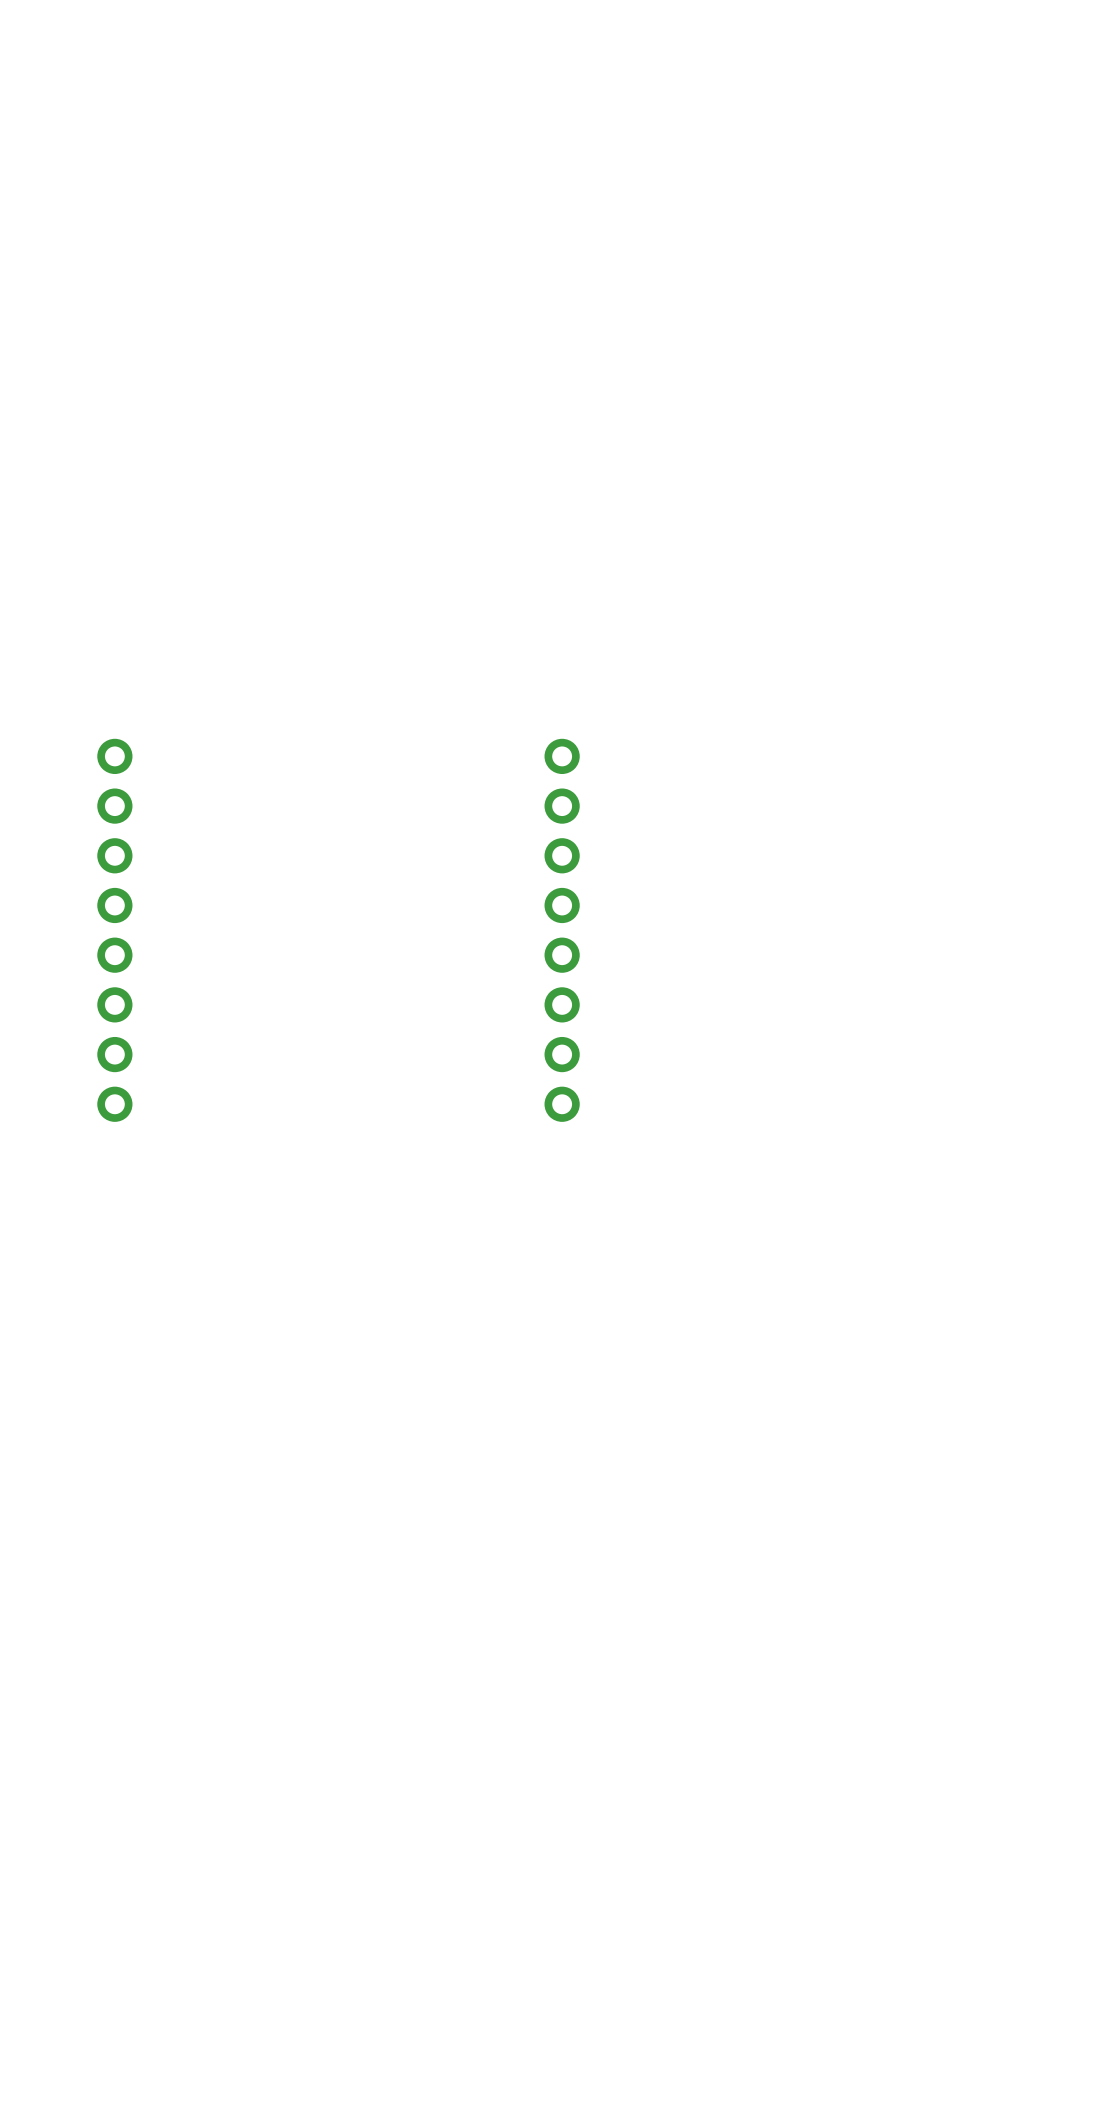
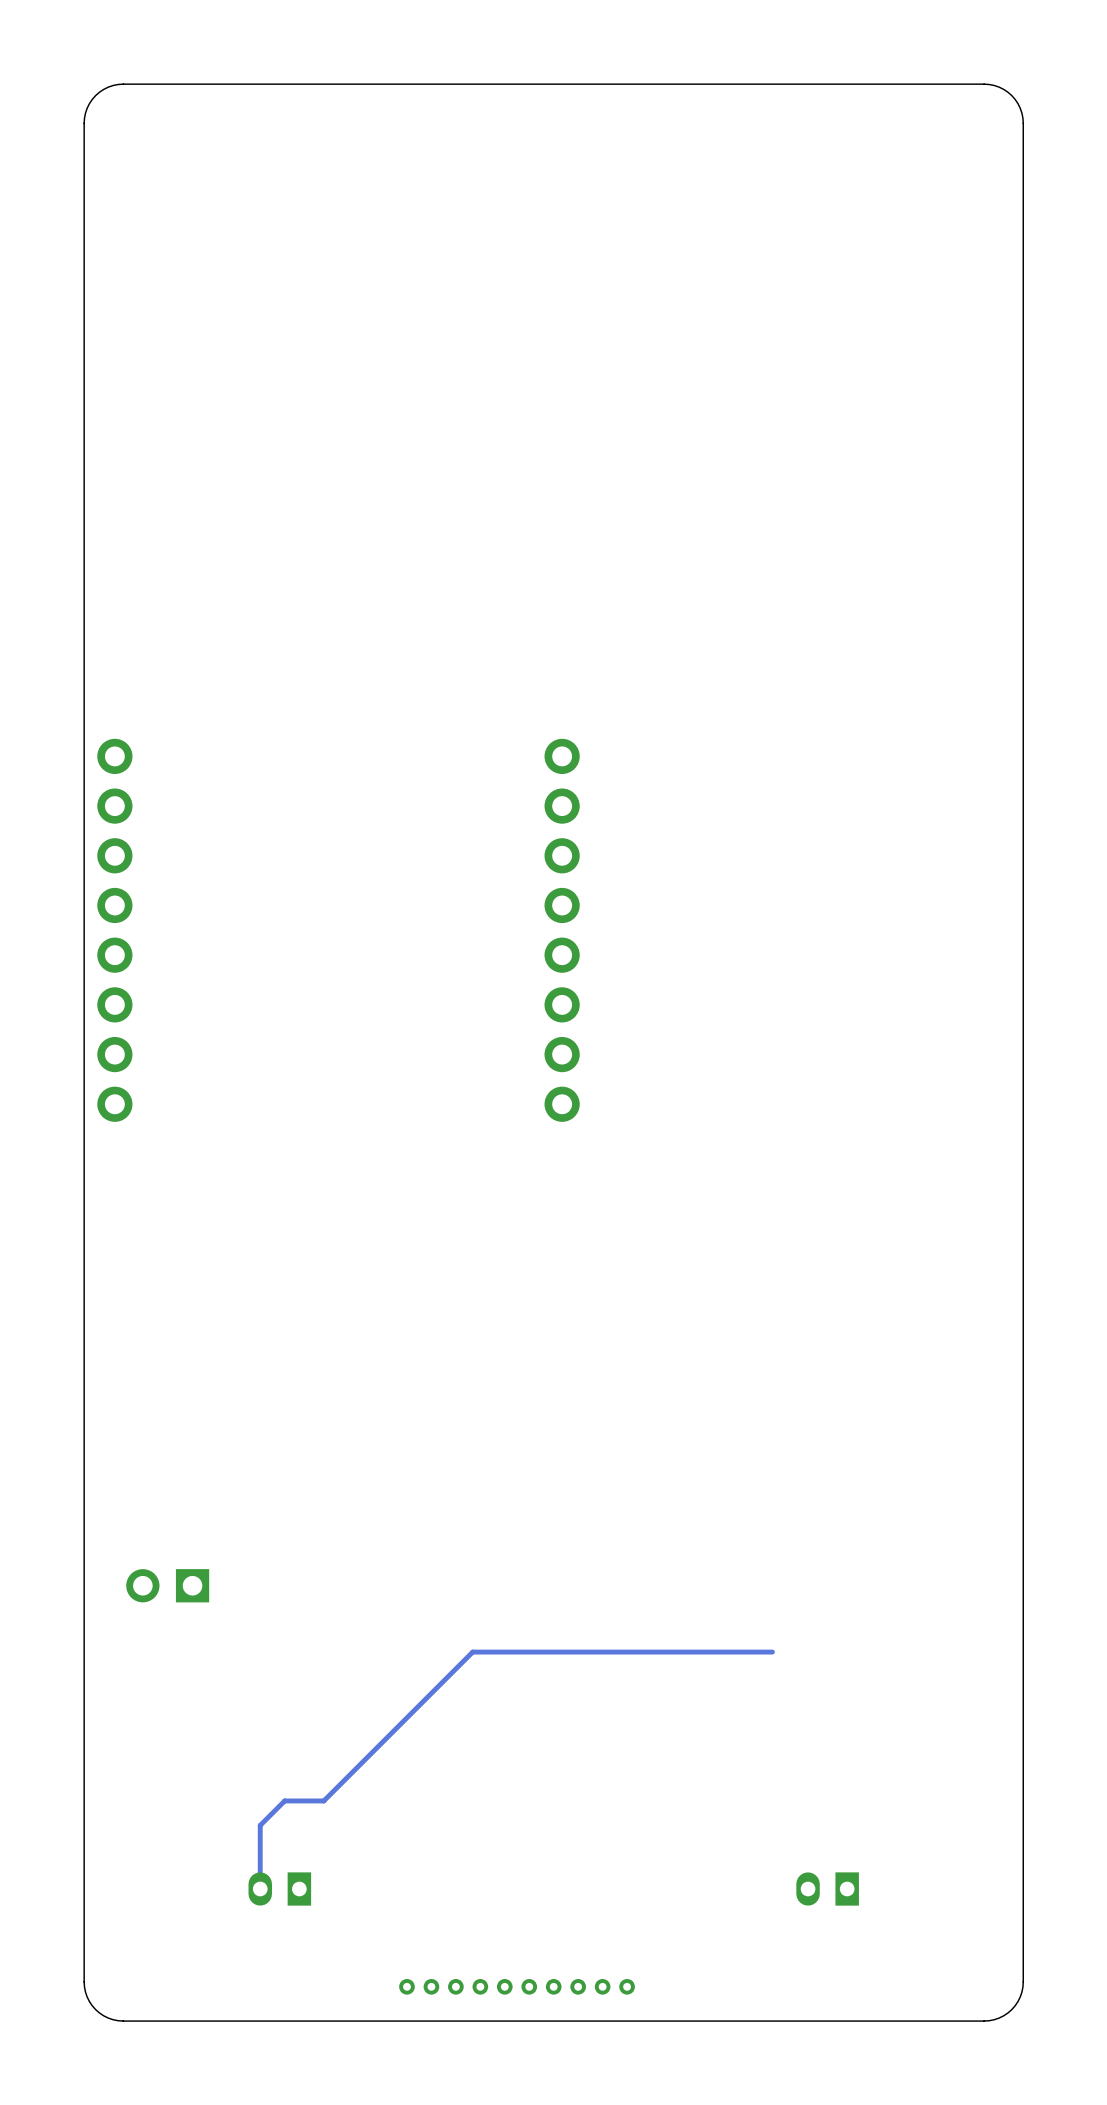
board edge: none -> (984, 84) (123, 84) (113, 85) (99, 92) (87, 108) (84, 123) (84, 1981) (87, 1996) (92, 2005) (108, 2018) (123, 2021) (984, 2021) (999, 2018) (1007, 2012) (1020, 1996) (1023, 1981) (1023, 123) (1020, 108) (1011, 95) (999, 87) (984, 84)
part: none -> (167, 1585)
track: none -> (772, 1652) (472, 1652) (323, 1800) (284, 1800) (260, 1825) (260, 1889)
part: none -> (279, 1889)
part: none -> (827, 1889)
via: none -> (406, 1986)
via: none -> (431, 1986)
via: none -> (455, 1986)
via: none -> (480, 1986)
via: none -> (504, 1986)
via: none -> (529, 1986)
via: none -> (553, 1986)
via: none -> (578, 1986)
via: none -> (602, 1986)
via: none -> (627, 1986)

